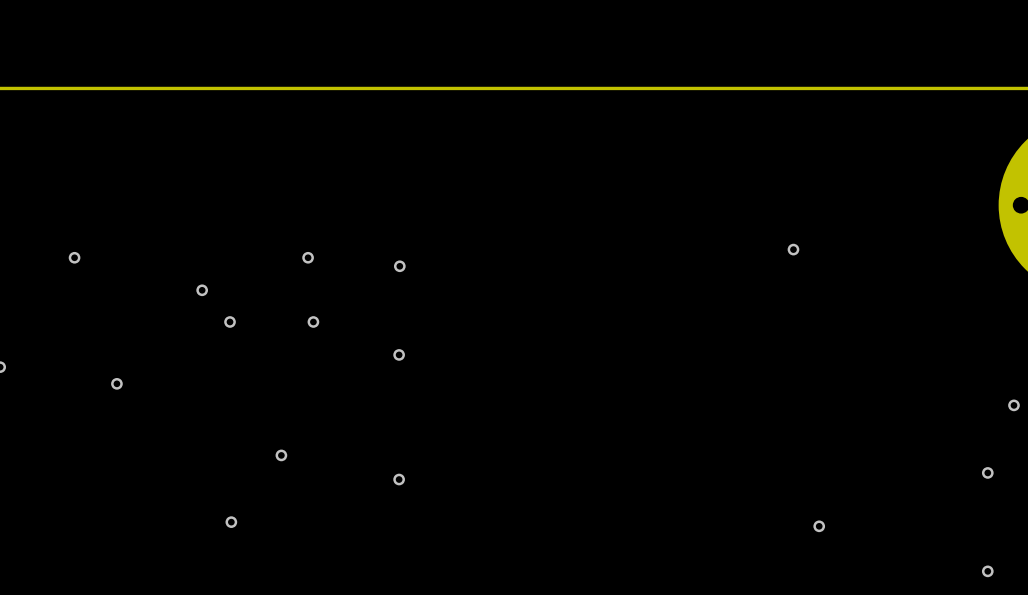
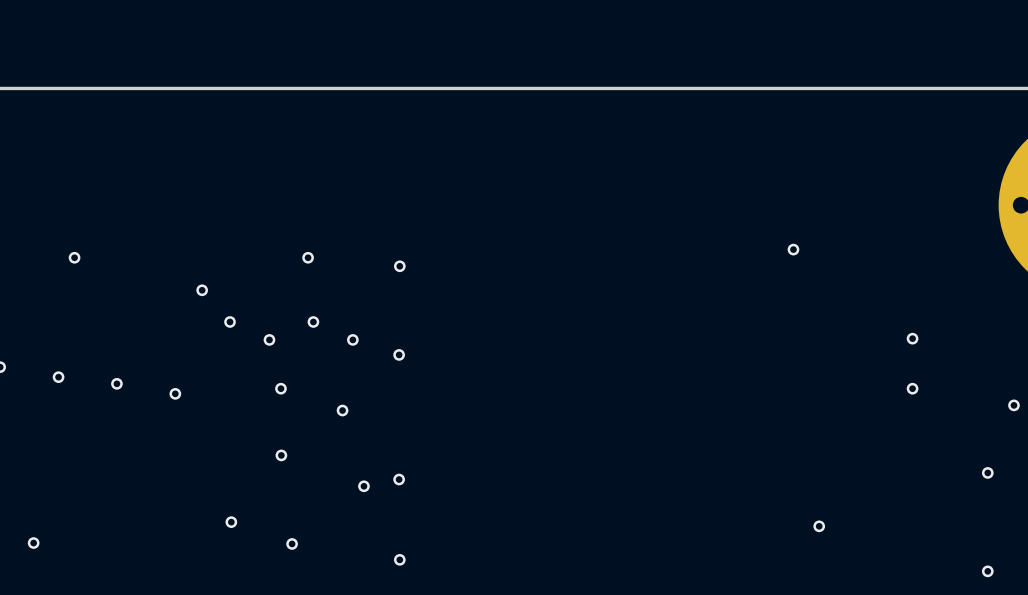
via: none -> (912, 338)
via: none -> (269, 339)
via: none -> (352, 339)
via: none -> (58, 377)
via: none -> (280, 388)
via: none -> (912, 388)
via: none -> (175, 393)
via: none -> (342, 410)
via: none -> (363, 486)
via: none -> (33, 543)
via: none -> (292, 543)
via: none -> (399, 559)

